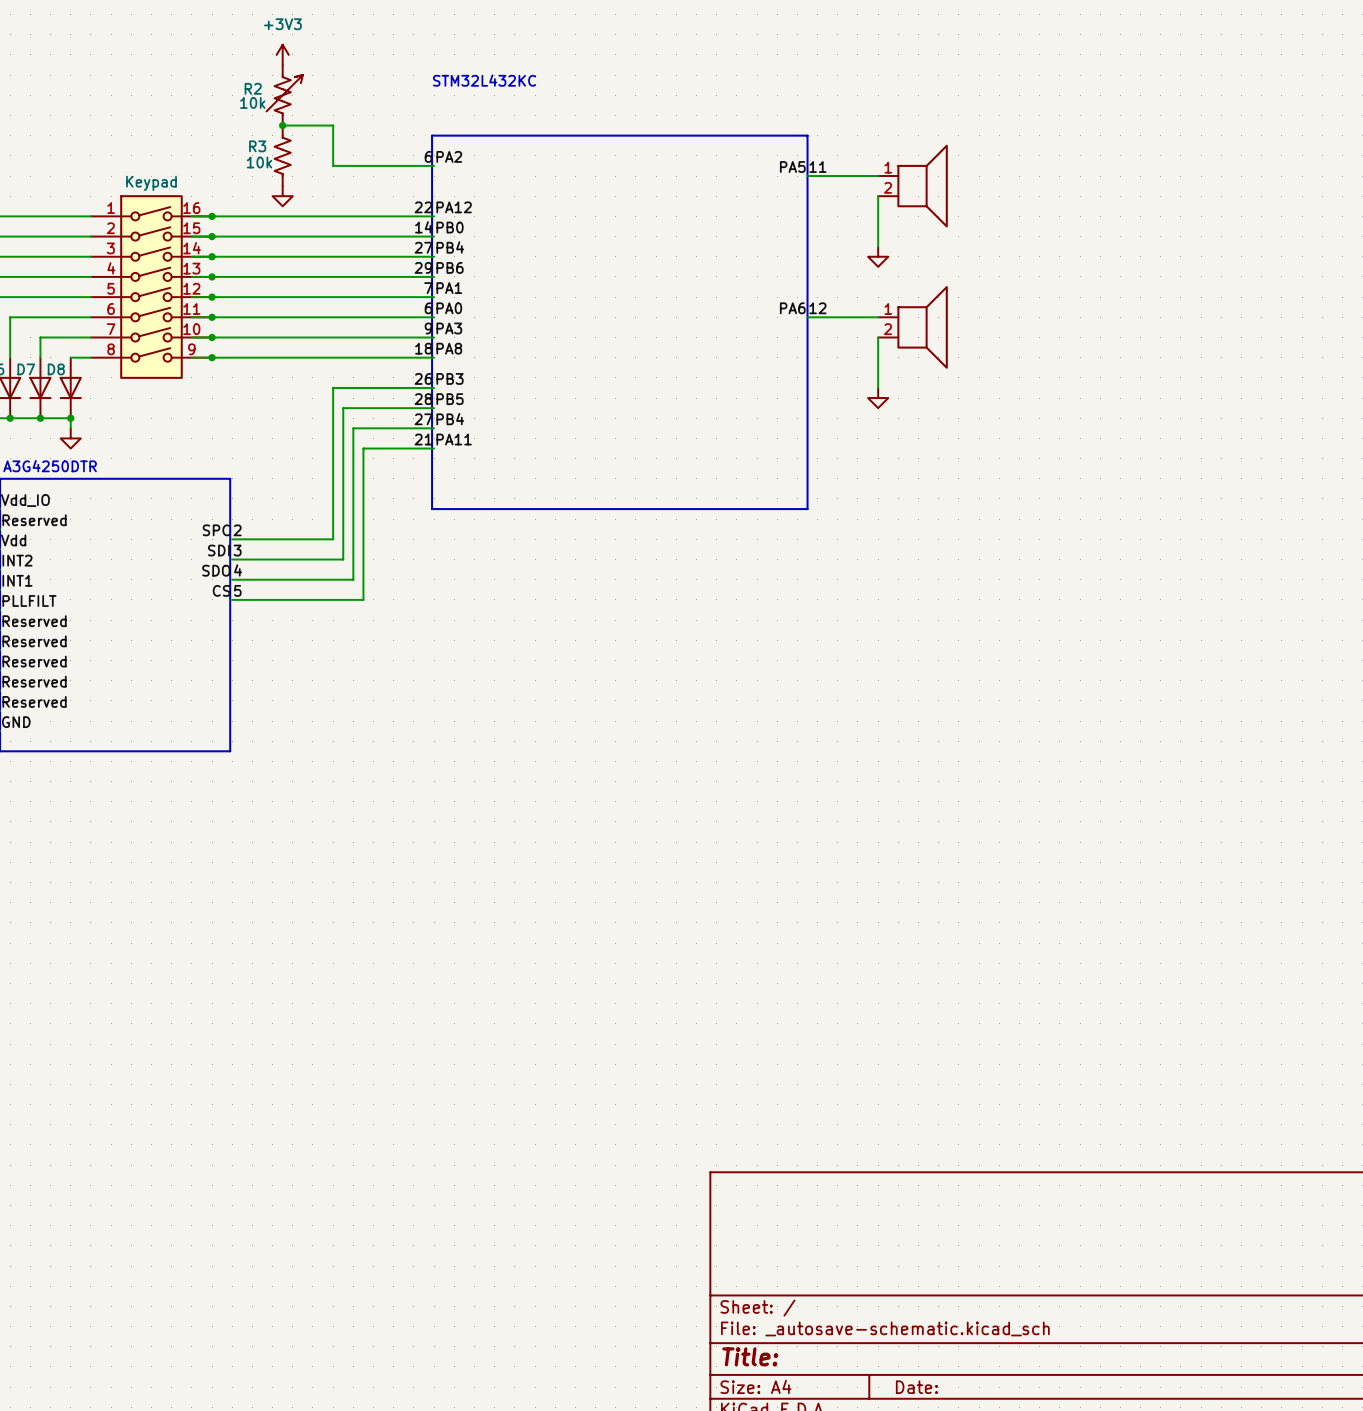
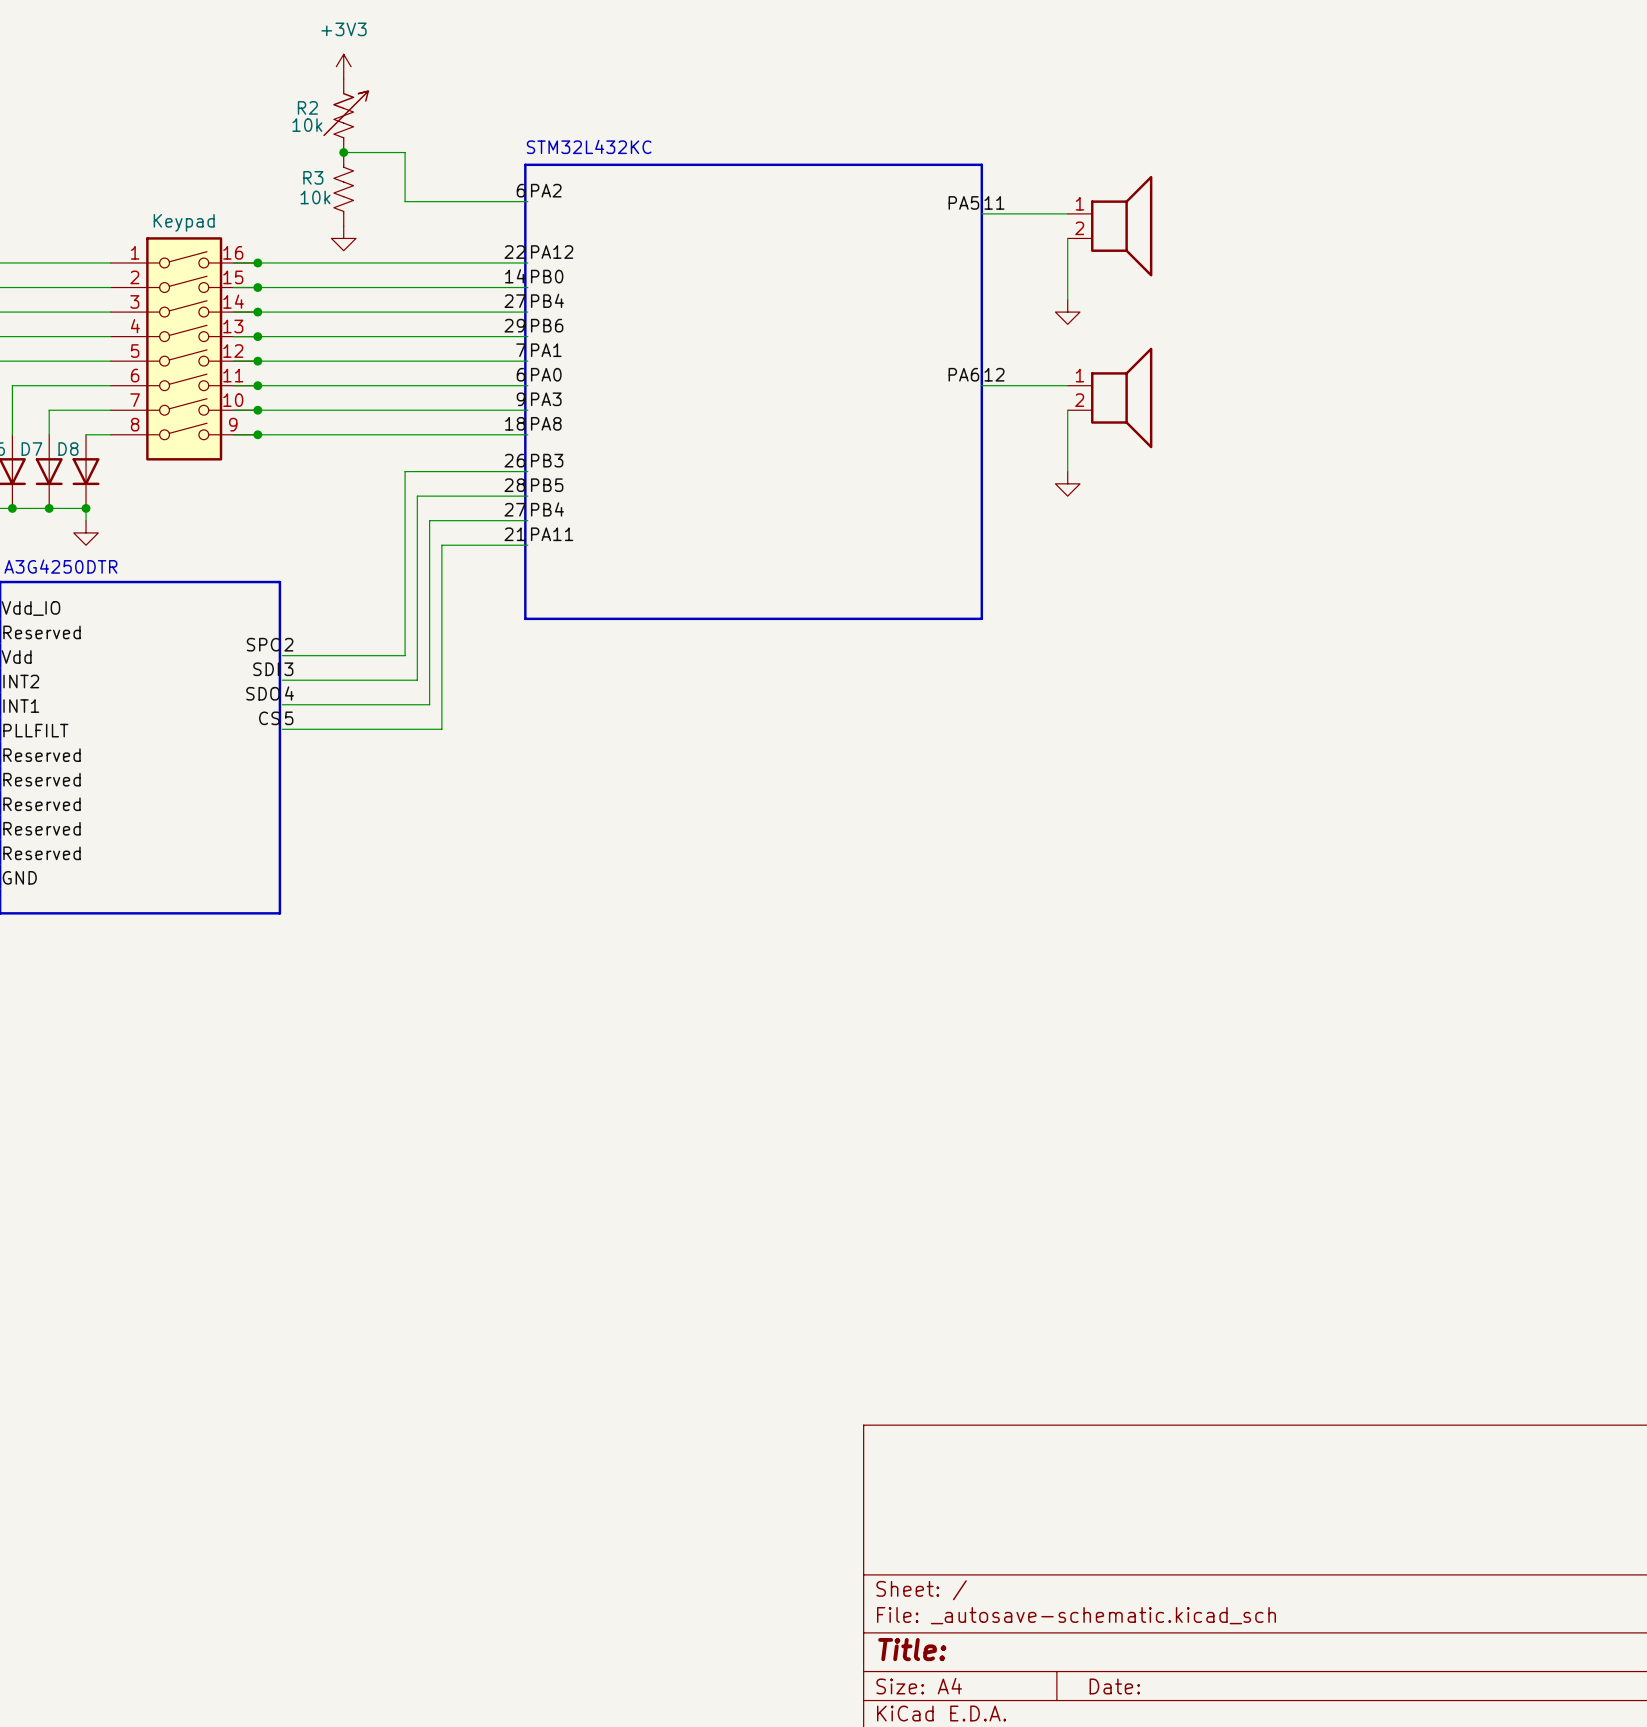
text position: STM32L432KC (484, 80) -> STM32L432KC (589, 146)

